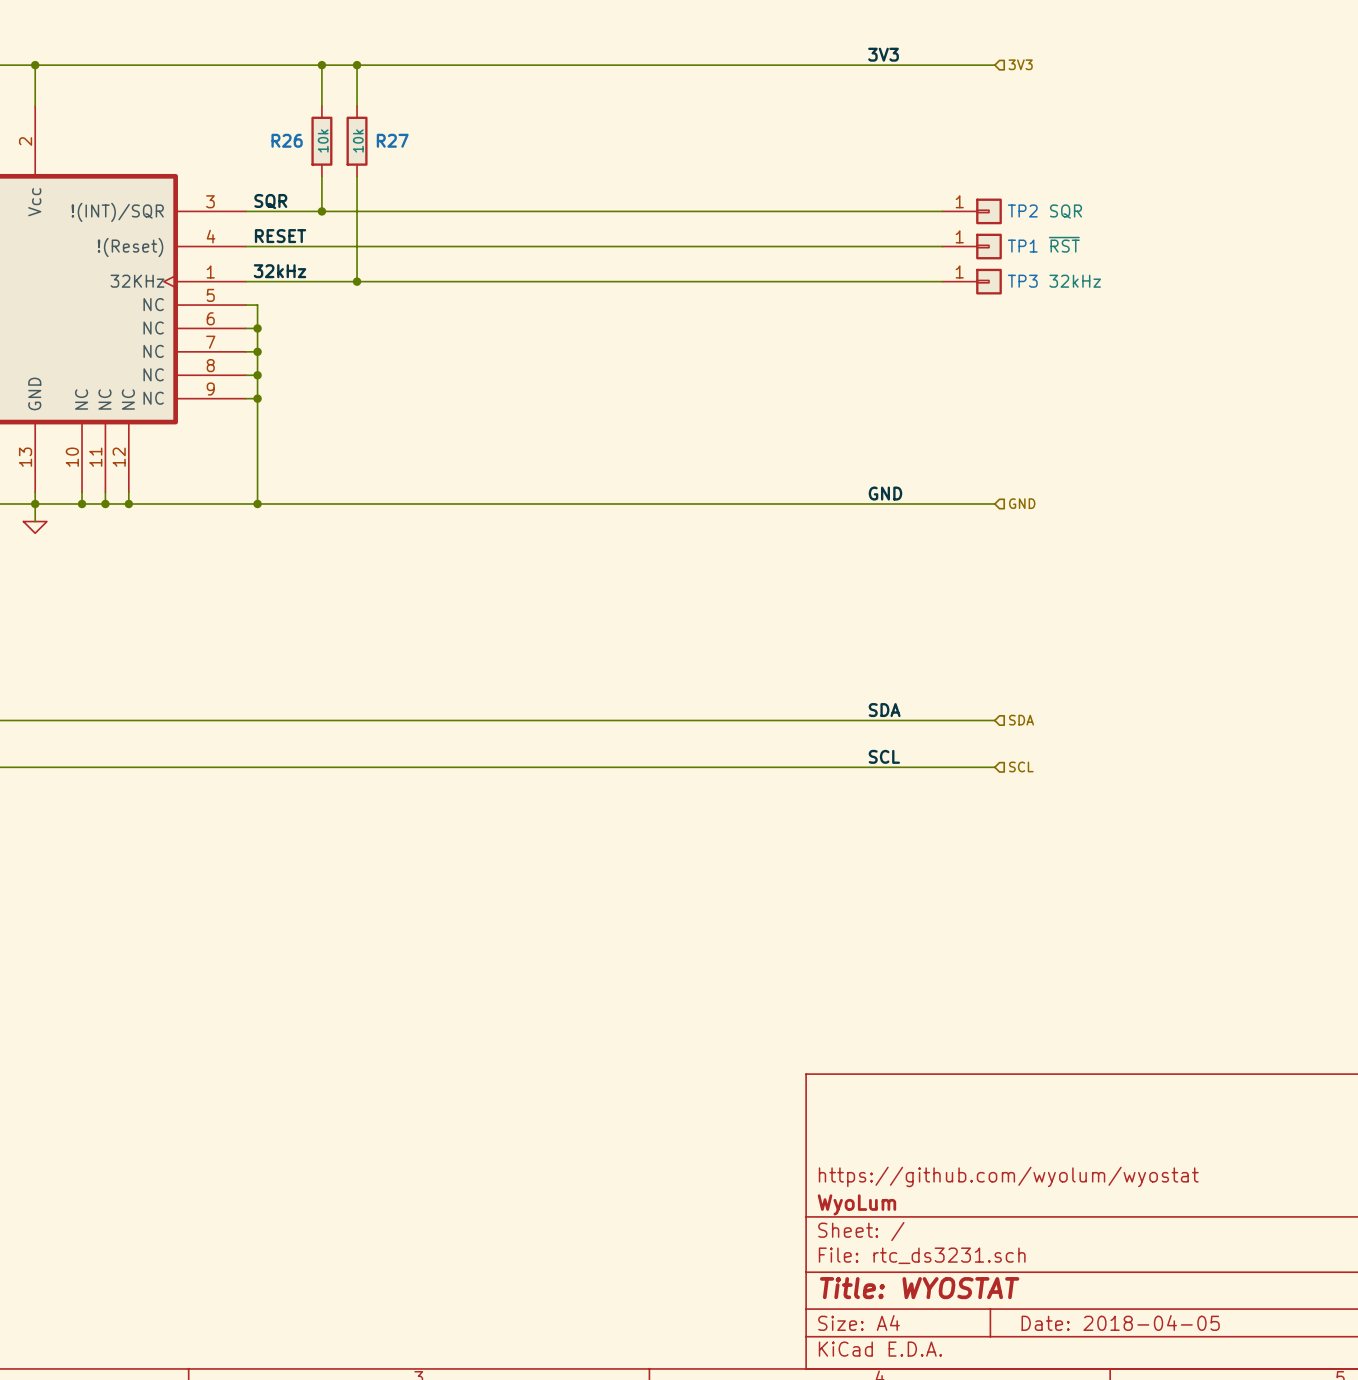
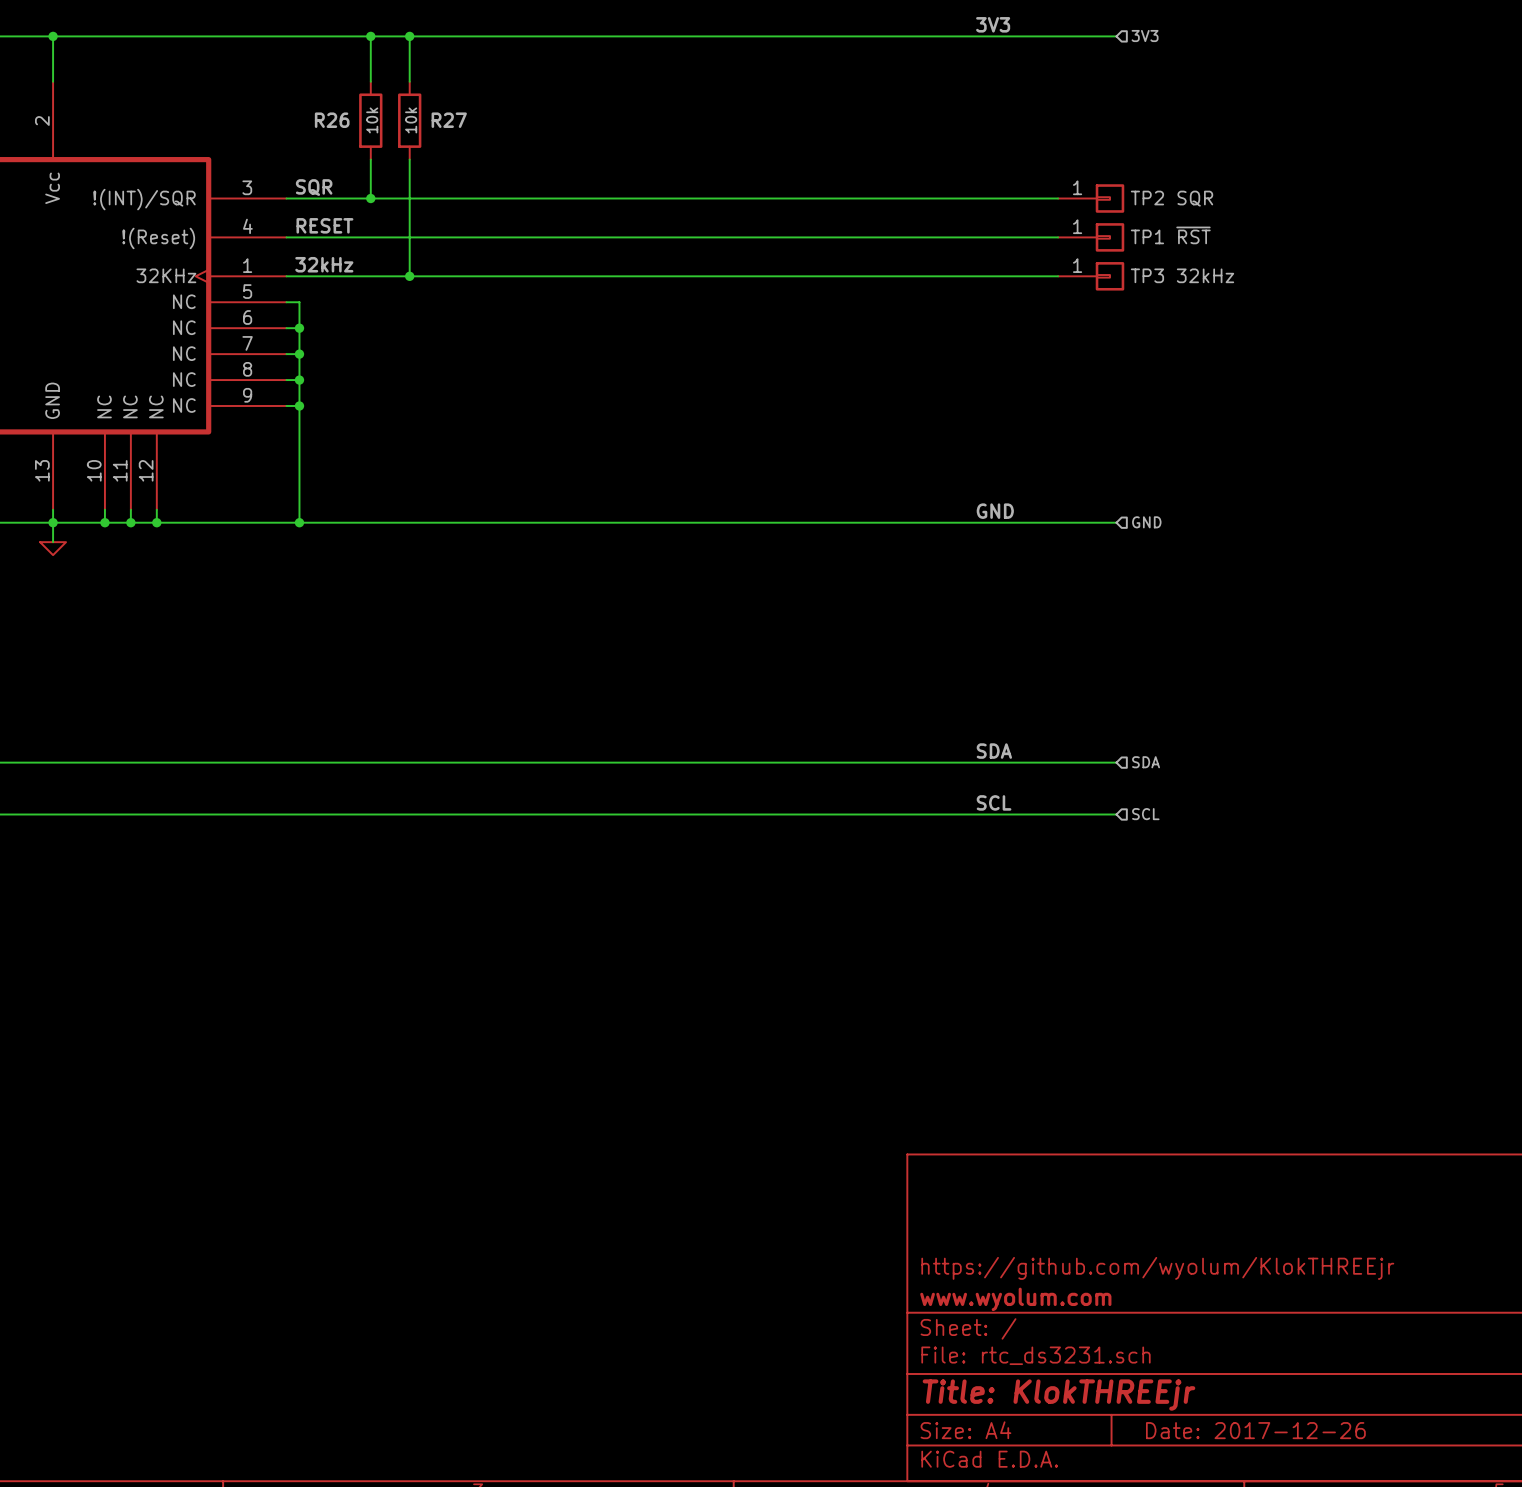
title block: https://github.com/wyolum/wyostat (1008, 1176) -> https://github.com/wyolum/KlokTHREEjr (1157, 1268)
title block: WyoLum (856, 1204) -> www.wyolum.com (1015, 1299)
title block: Title: WYOSTAT (919, 1288) -> Title: KlokTHREEjr (1058, 1395)
title block: Date: 2018-04-05 (1120, 1322) -> Date: 2017-12-26 (1255, 1430)

